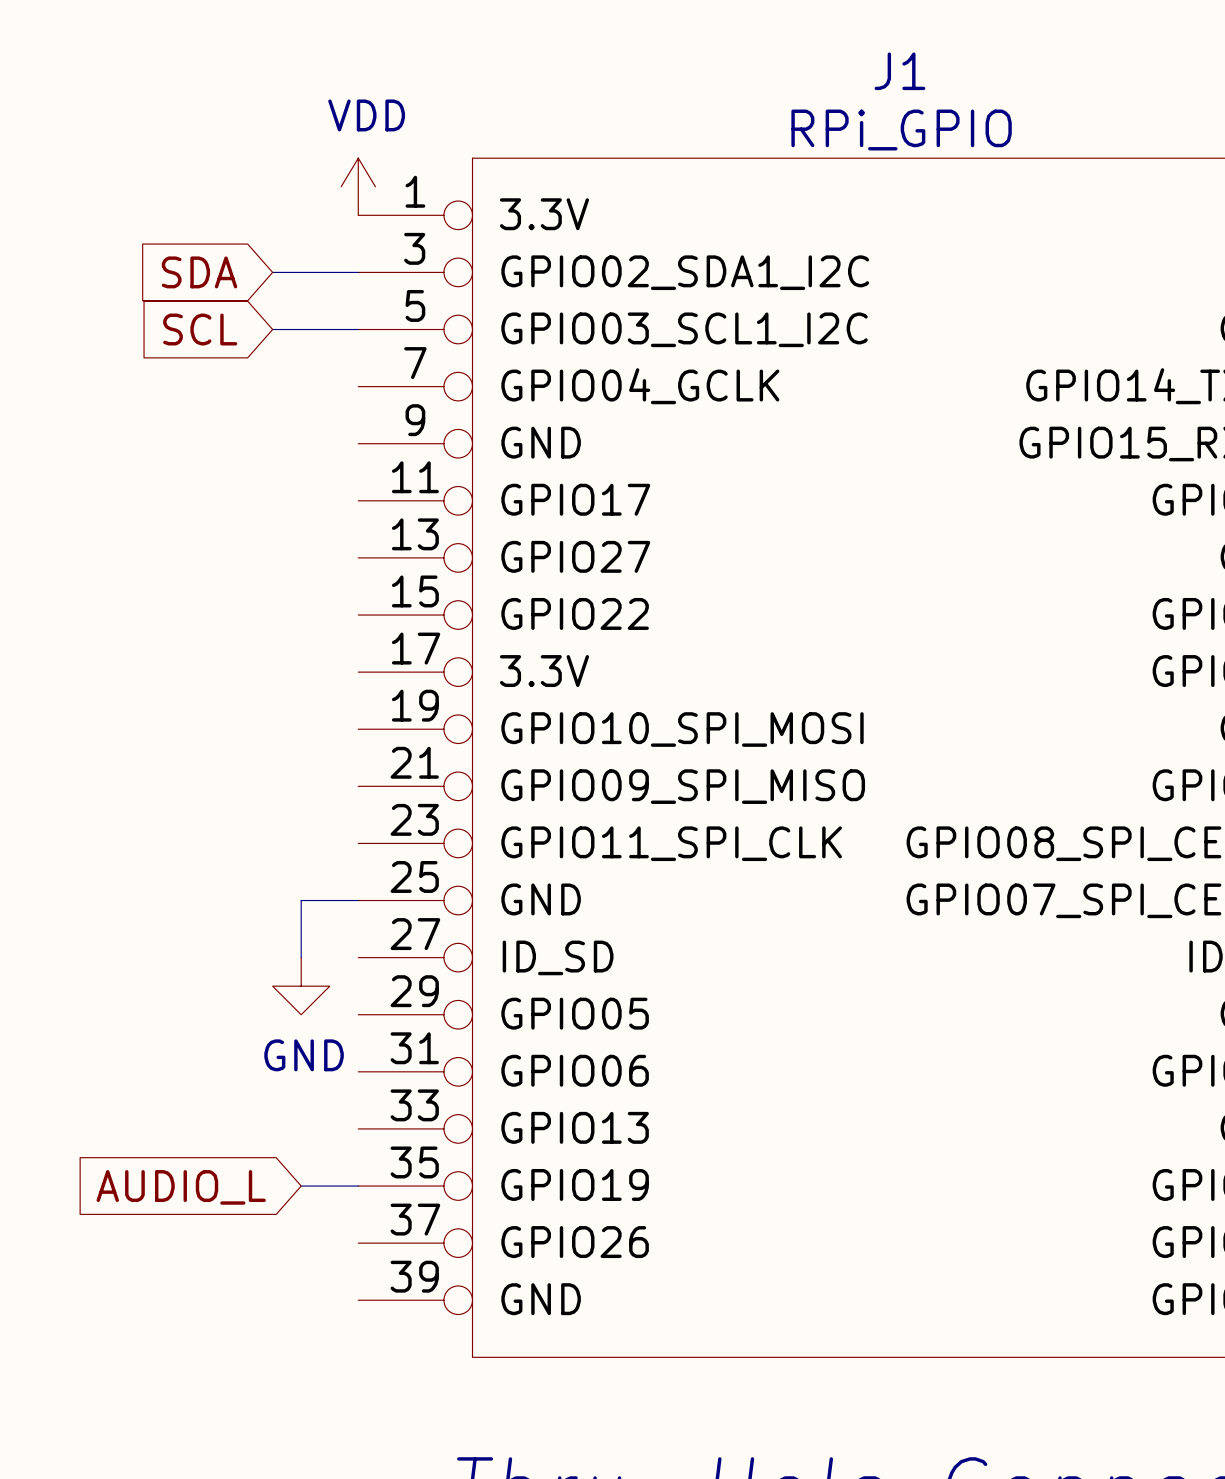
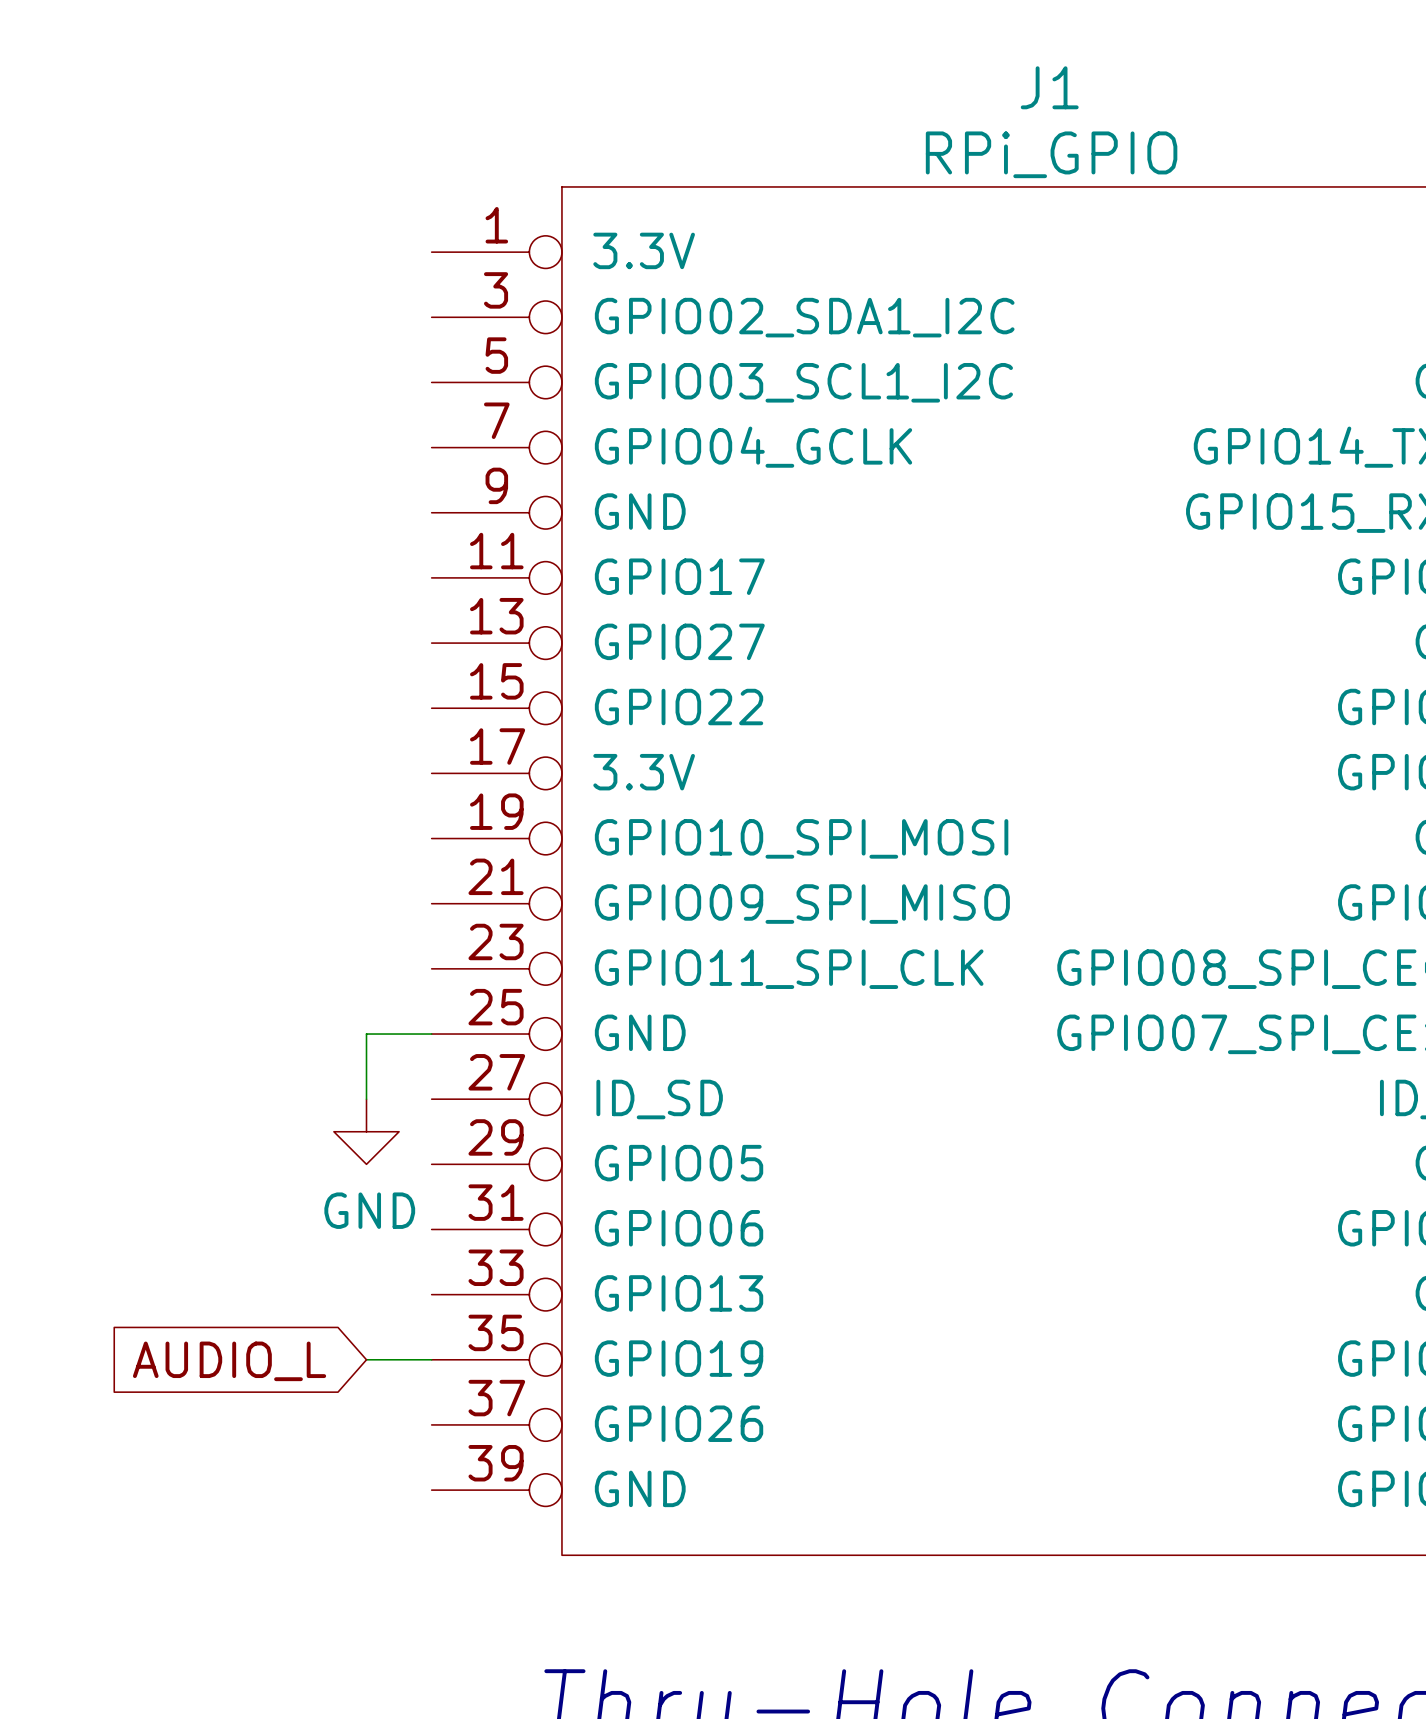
power symbol: VDD (358, 186) -> none
global label: SDA (199, 272) -> none
wire: (272, 272) (358, 272) -> none
global label: SCL (200, 329) -> none
wire: (272, 329) (358, 329) -> none

